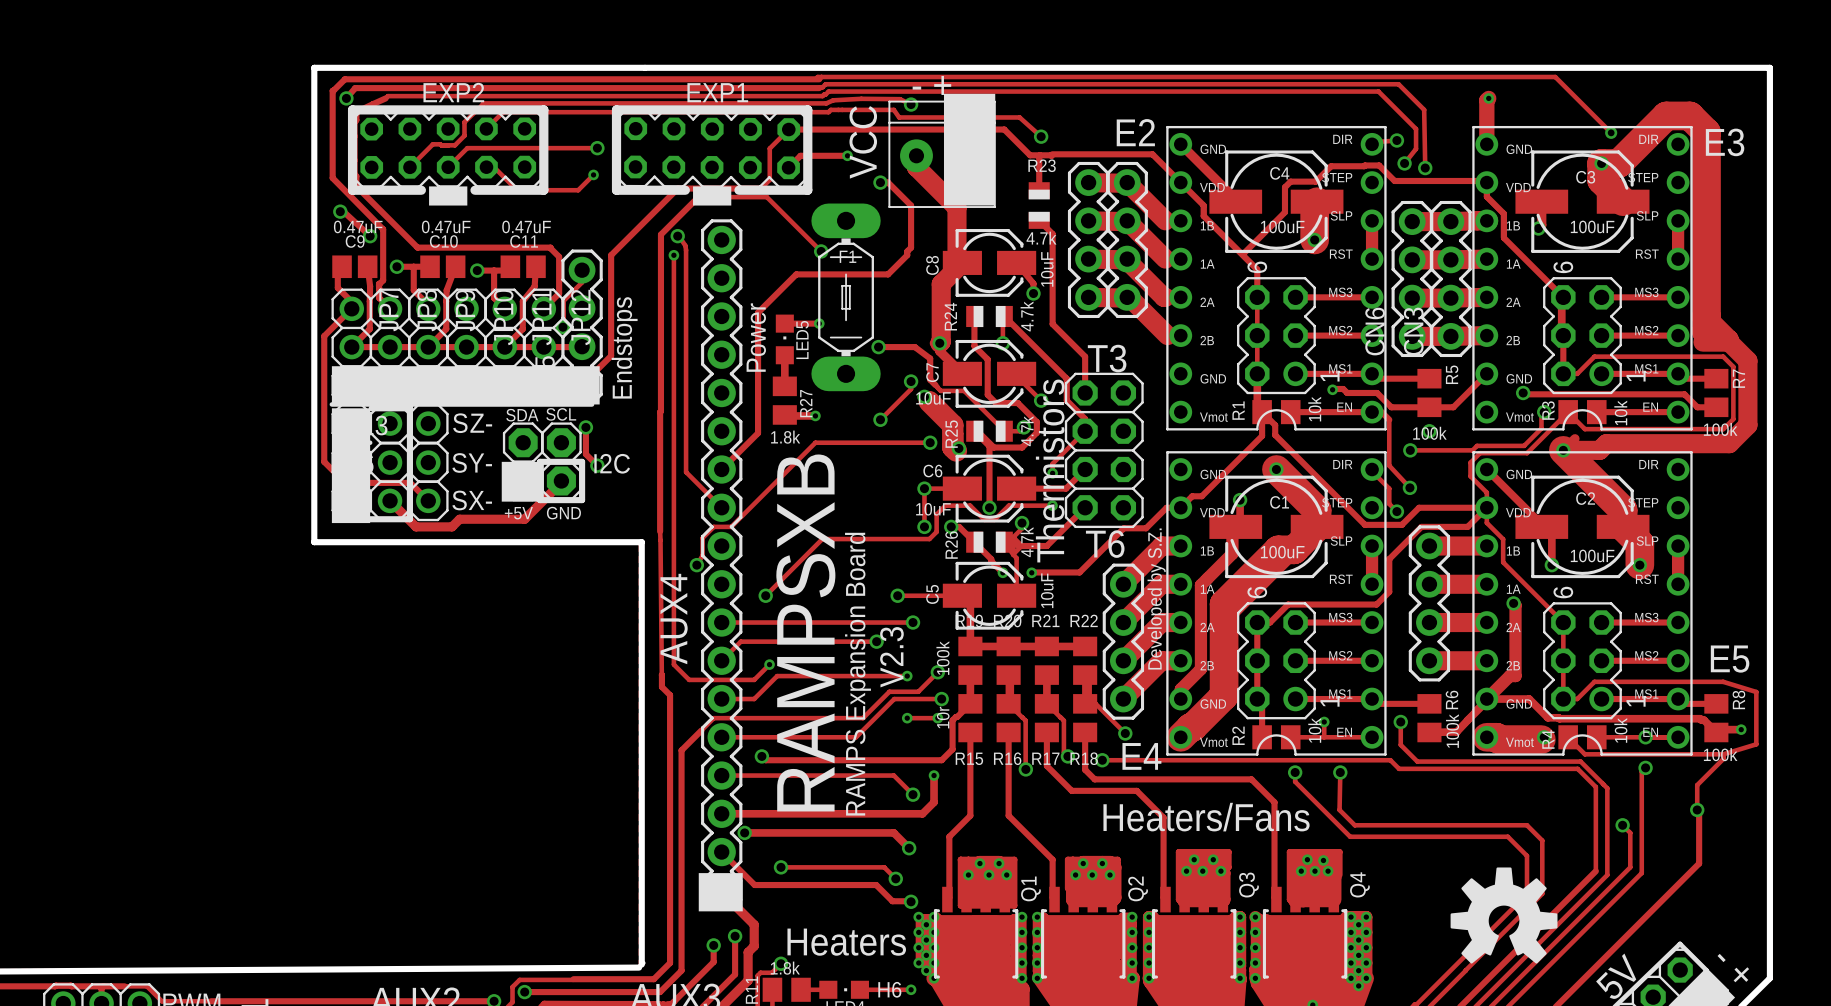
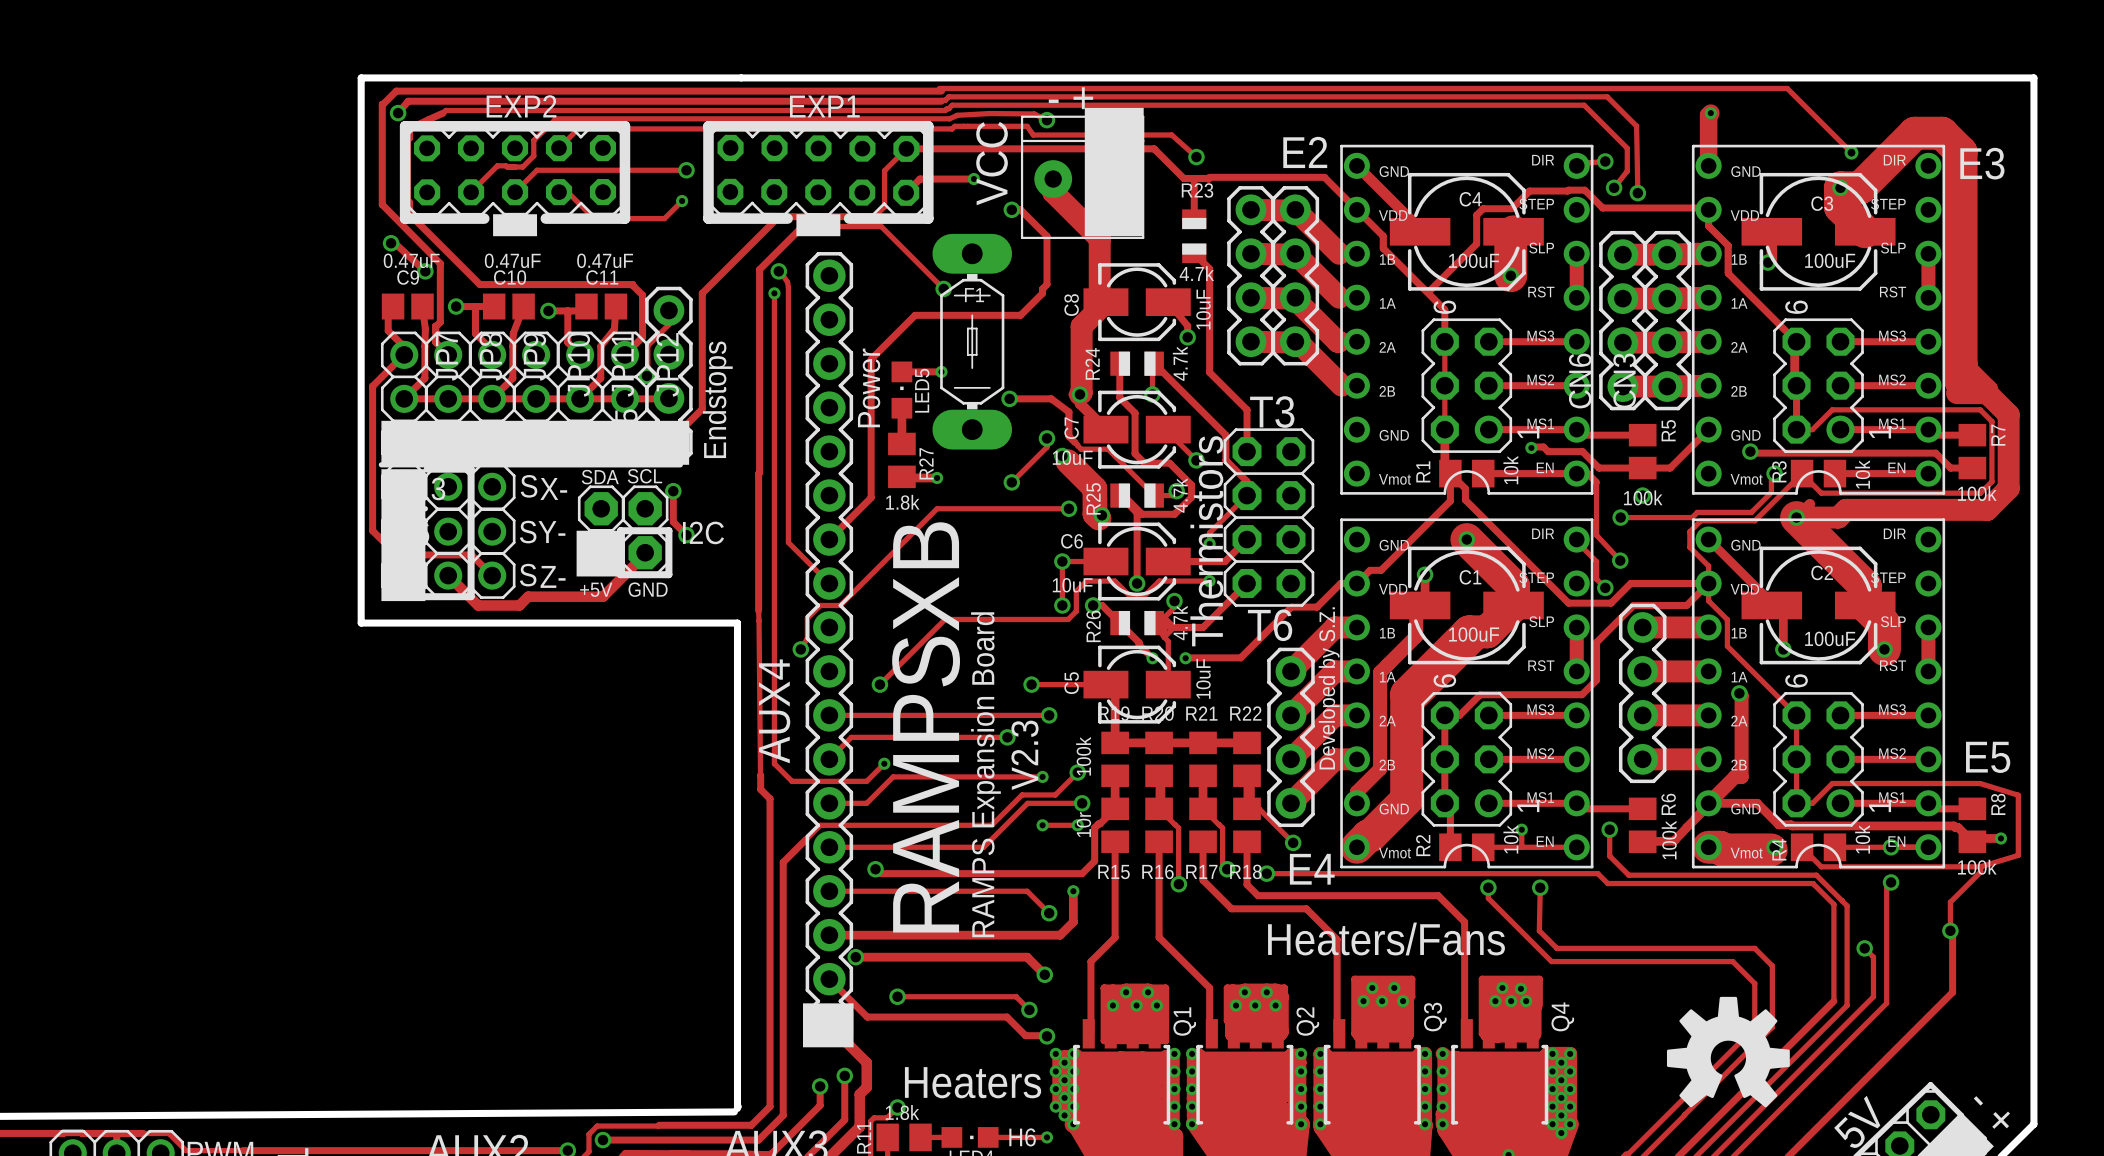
text position: Z- (481, 423) -> Z- (553, 576)
text position: X- (480, 500) -> X- (553, 488)

